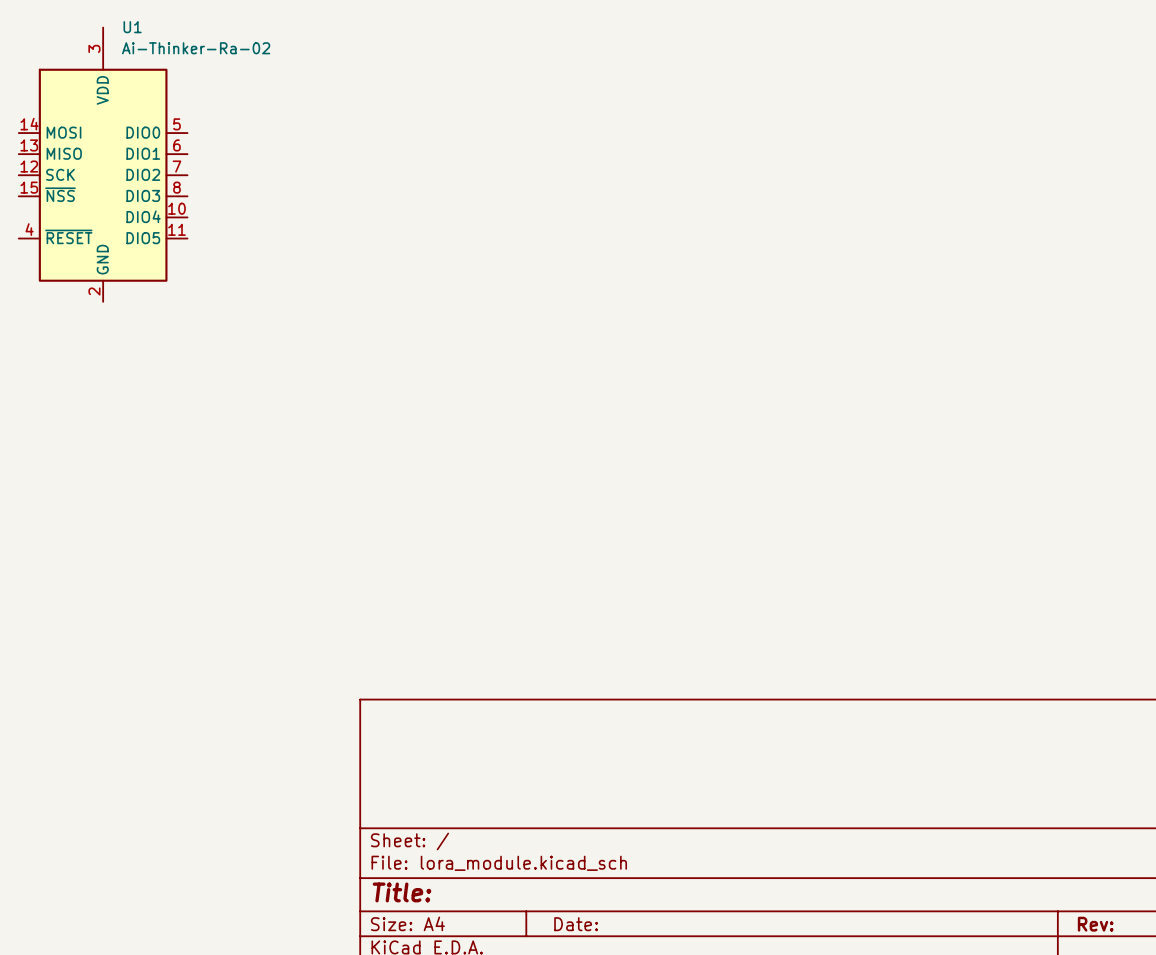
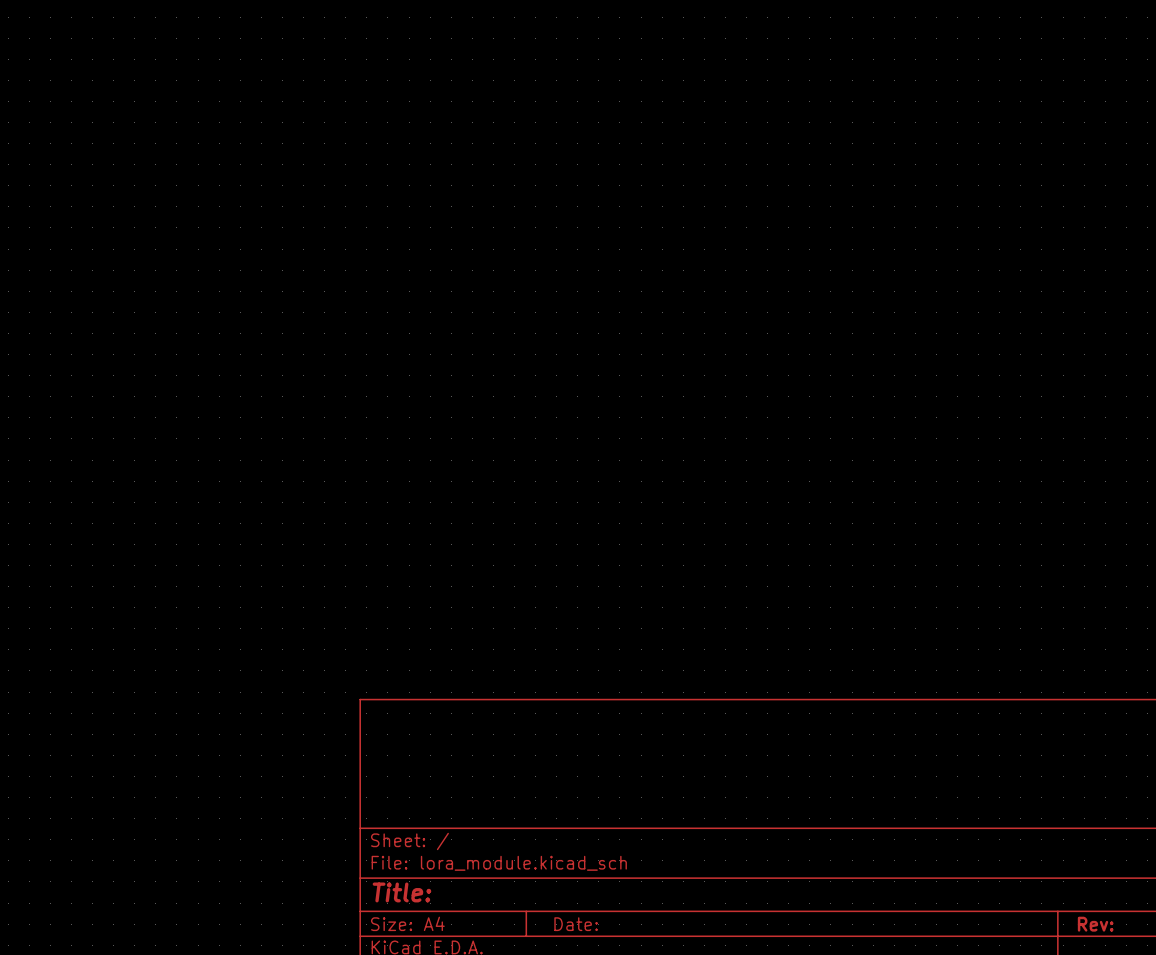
U1: Ai-Thinker-Ra-02 (103, 164) -> none

